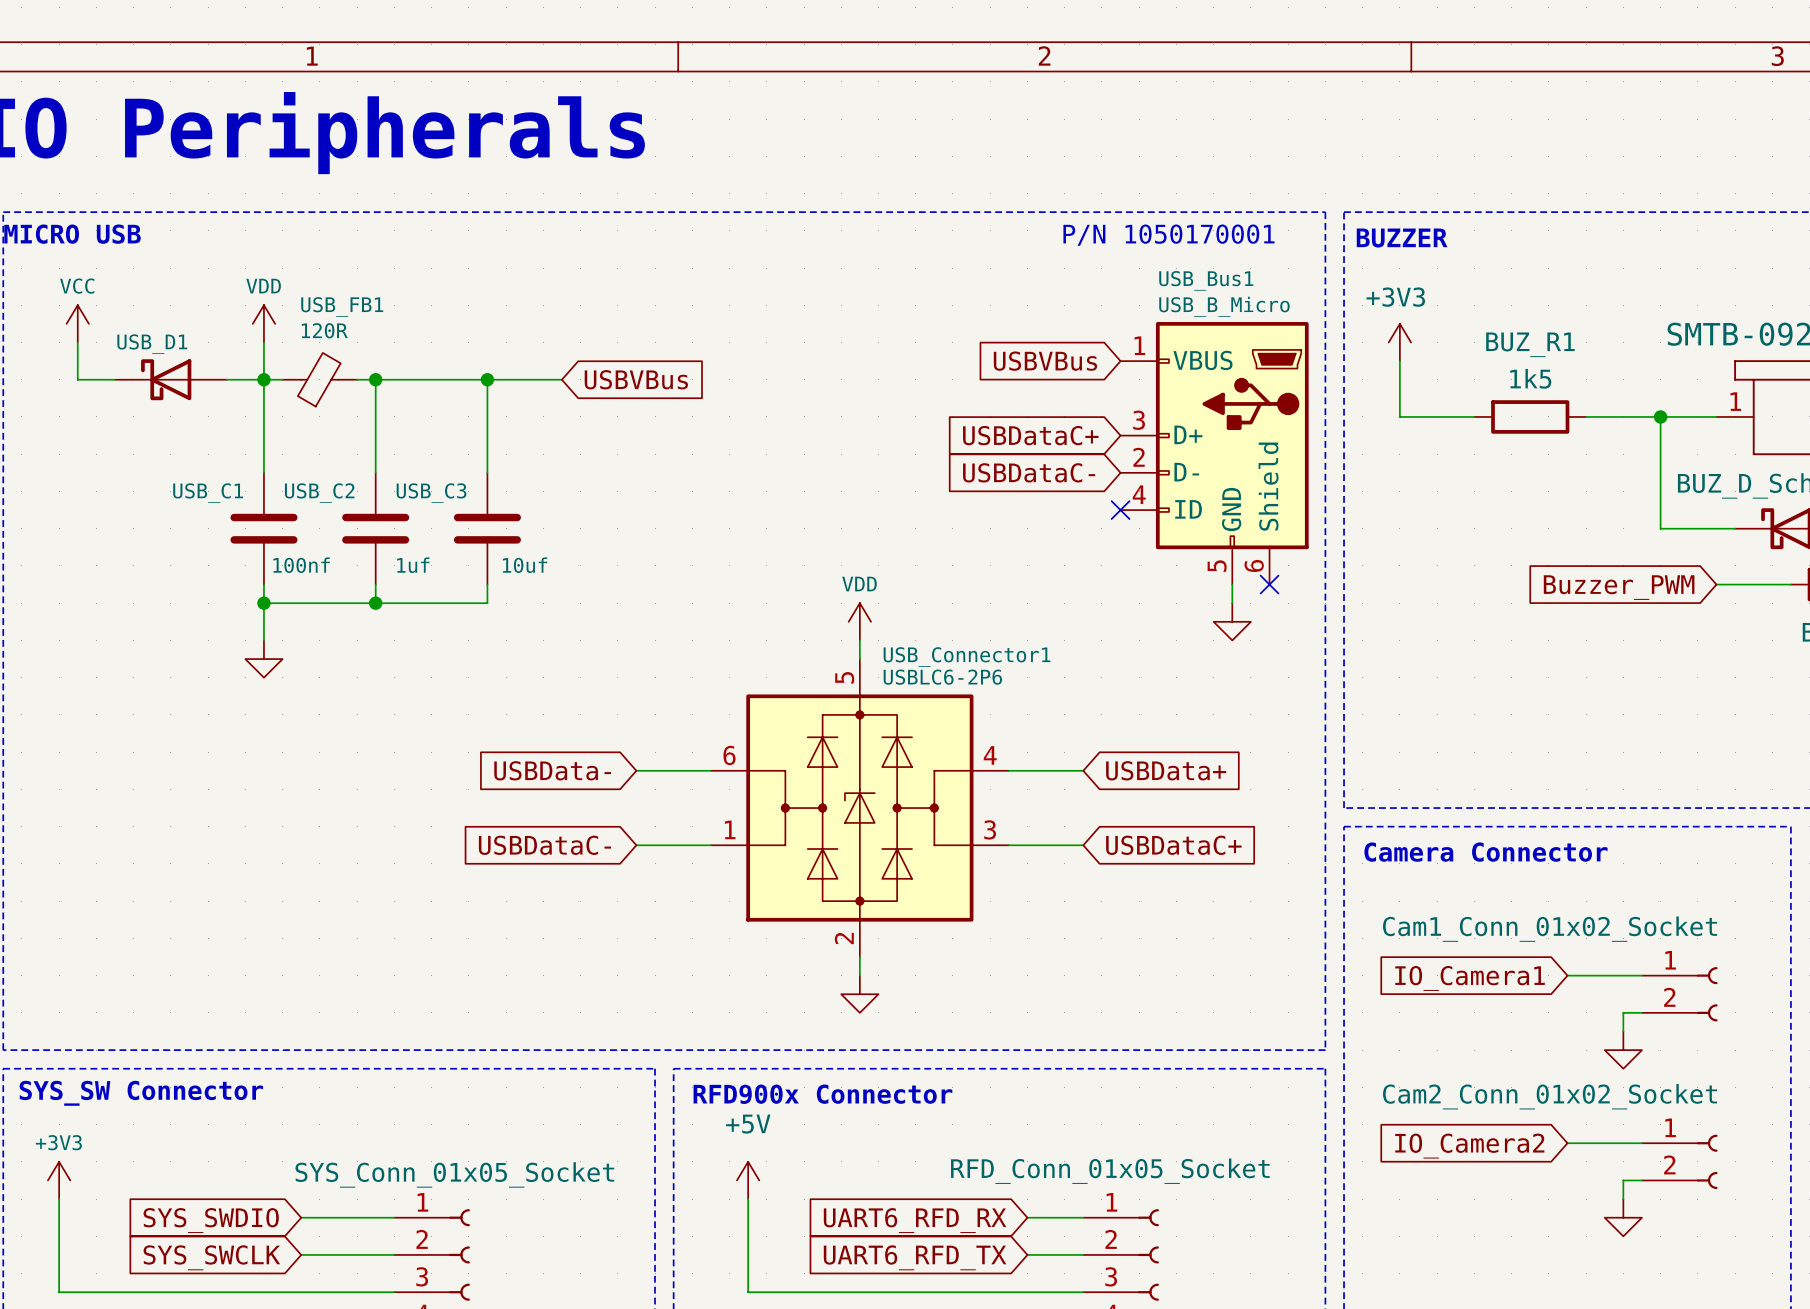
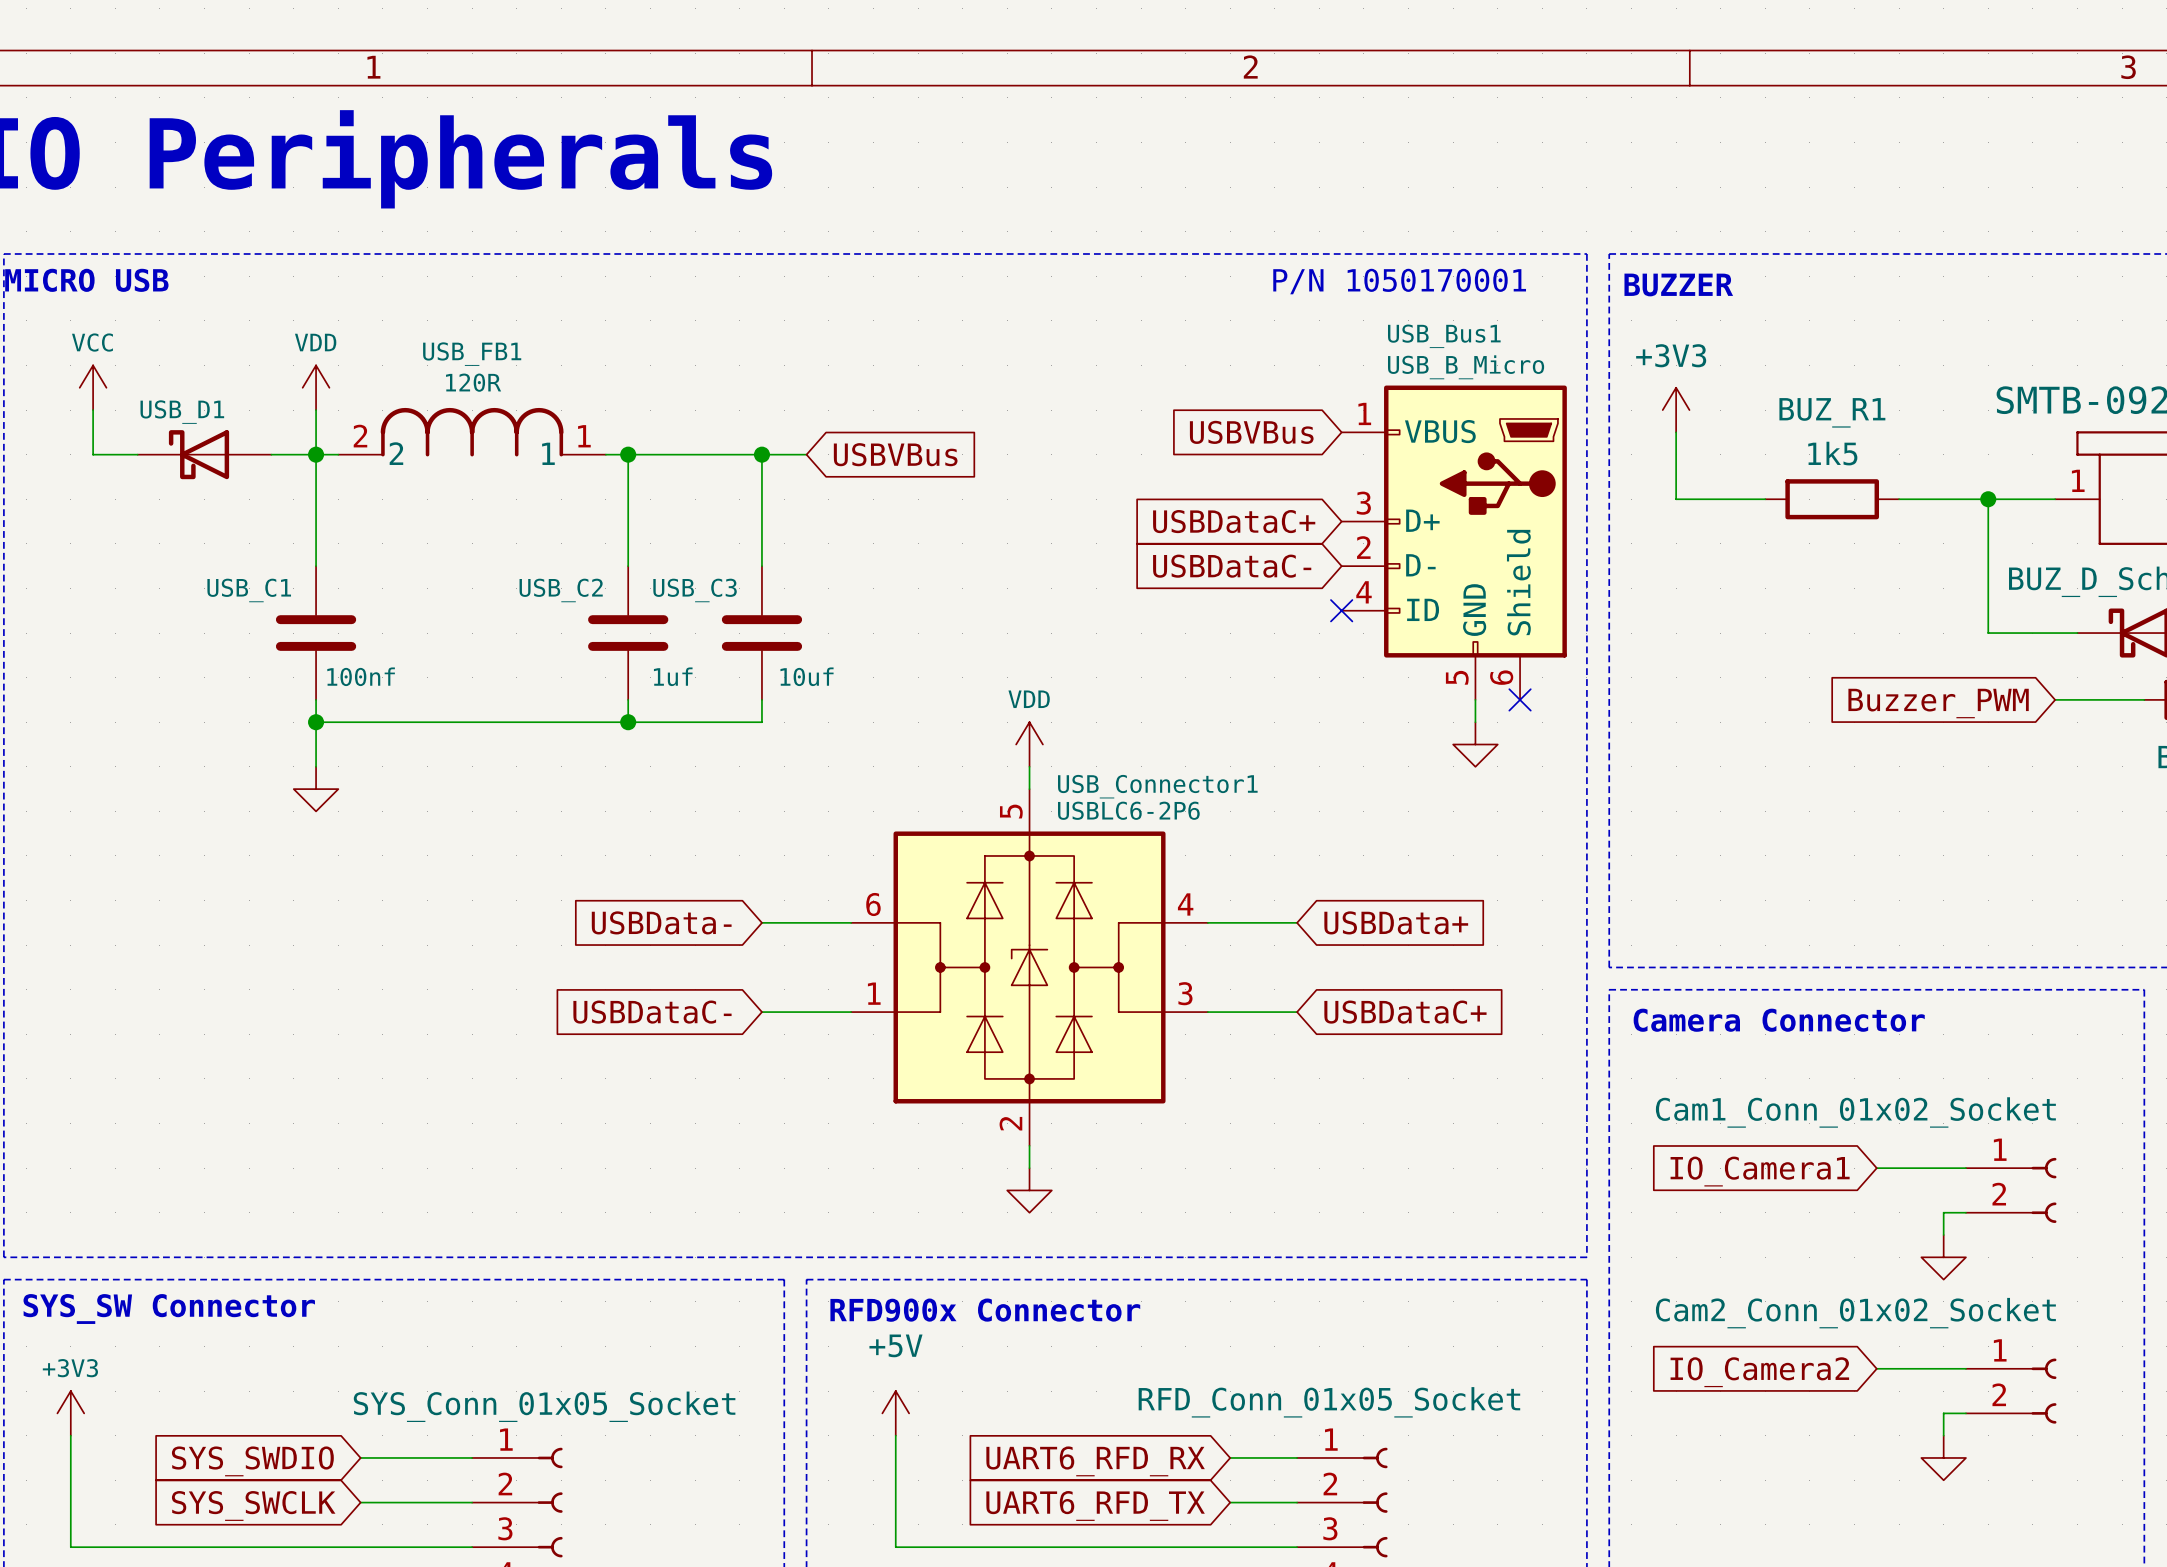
USB_FB1 symbol: [282, 352, 358, 407] -> [338, 407, 606, 457]
wire: (357, 379) (506, 379) -> none
wire: (375, 379) (375, 472) -> (628, 454) (628, 566)
junction: (375, 379) -> none
wire: (487, 379) (487, 472) -> (761, 454) (761, 566)
junction position: (487, 379) -> (628, 454)
wire: none -> (672, 454) (806, 454)
junction: none -> (761, 454)
global label position: USBVBus (636, 379) -> USBVBus (895, 454)
USB_C2 position: (375, 528) -> (628, 633)
USB_C3 position: (487, 528) -> (761, 633)
wire: (375, 584) (375, 603) -> (628, 699) (628, 722)
wire: (487, 584) (487, 603) -> (761, 699) (761, 722) (583, 722)
junction: (375, 603) -> none
junction: none -> (628, 722)

